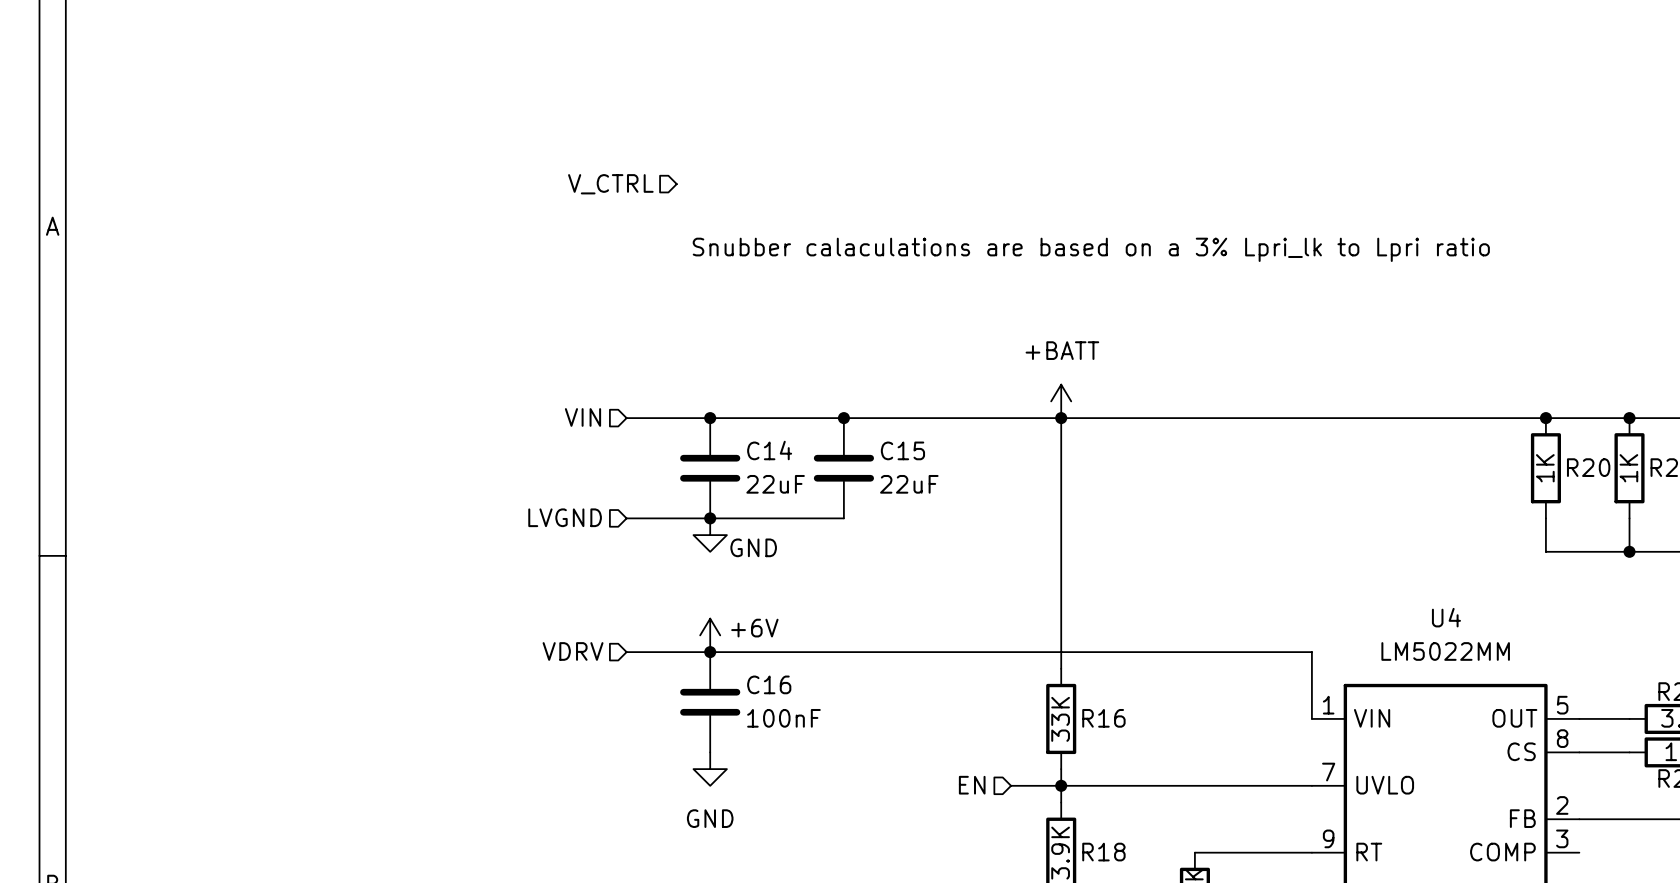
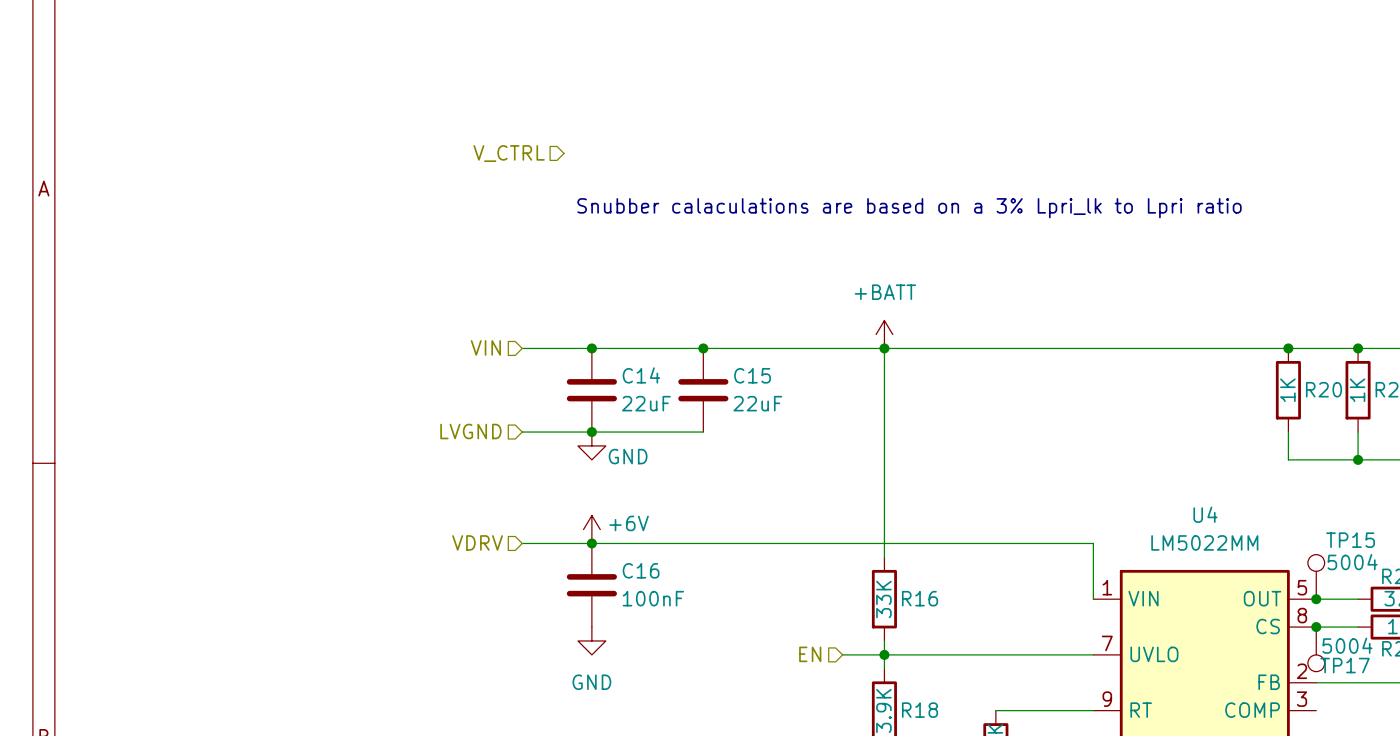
TP15: none -> 5004 (1316, 576)
junction: none -> (1316, 599)
junction: none -> (1316, 627)
TP17: none -> 5004 (1316, 649)

